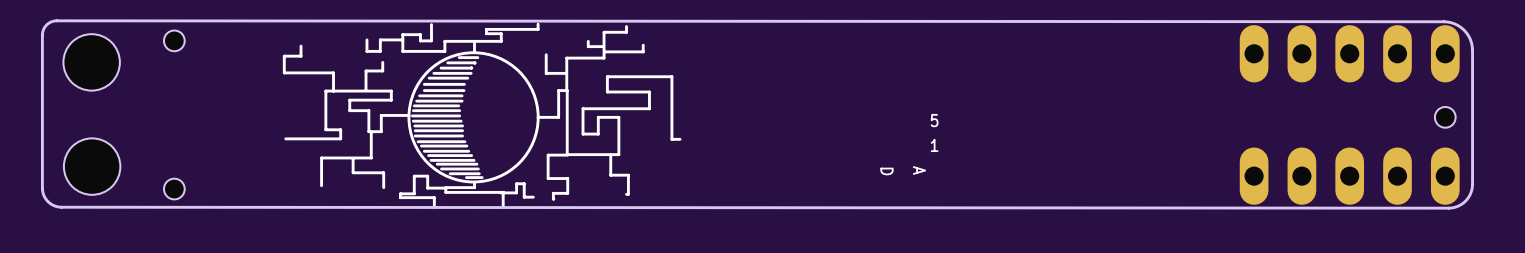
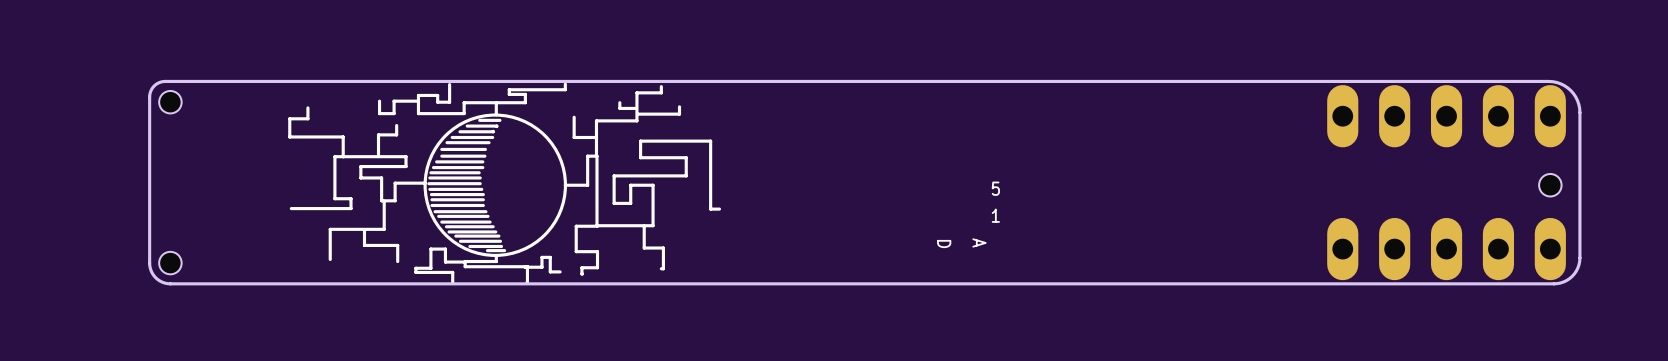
board edge: (1443, 21) (54, 20) (46, 25) (42, 33) (42, 188) (48, 201) (61, 207) (1448, 208) -> (1548, 81) (163, 81) (154, 86) (149, 94) (149, 263) (151, 271) (155, 277) (162, 282) (170, 283) (1553, 283)
hole: (91, 62) -> none
hole: (92, 166) -> none

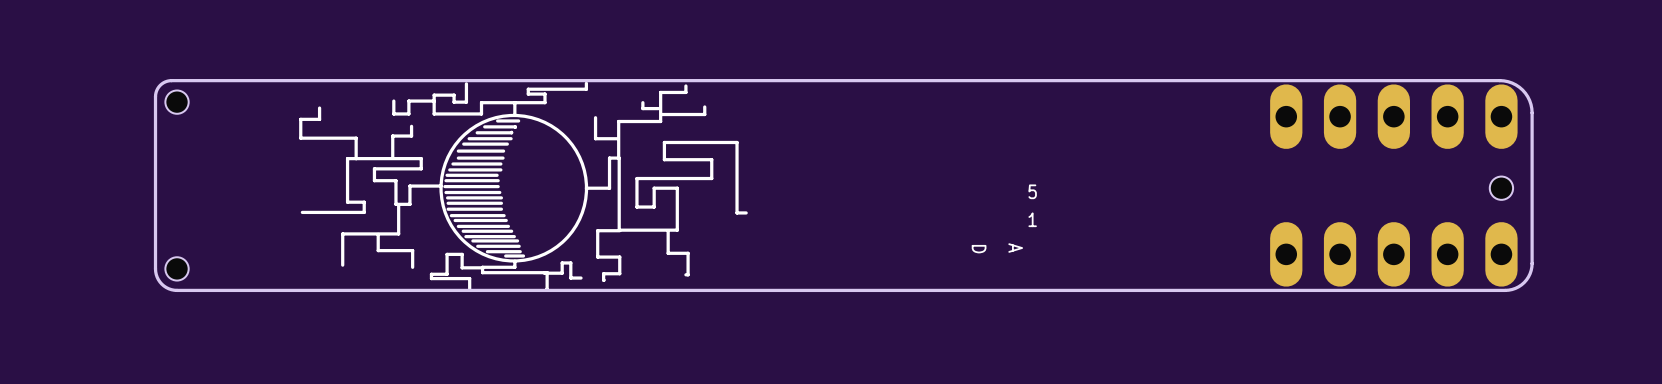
board edge: (1446, 81) (1556, 82) (1567, 87) (1573, 93) (1578, 104) (1579, 112) (1579, 257) (1574, 273) (1566, 280) (1557, 283) (1451, 283) -> (1499, 80) (1512, 83) (1522, 90) (1529, 100) (1532, 112) (1531, 267) (1528, 276) (1521, 284) (1505, 290)
part: none -> (1393, 116)
part: (1446, 116) -> none
hole position: (1550, 185) -> (1501, 188)
part: none -> (1393, 254)
part: (1446, 249) -> none

